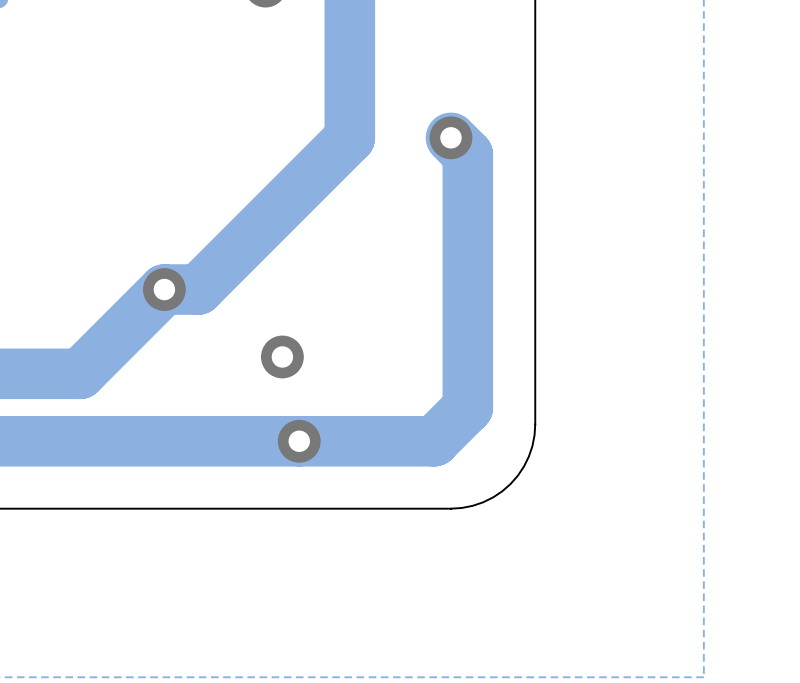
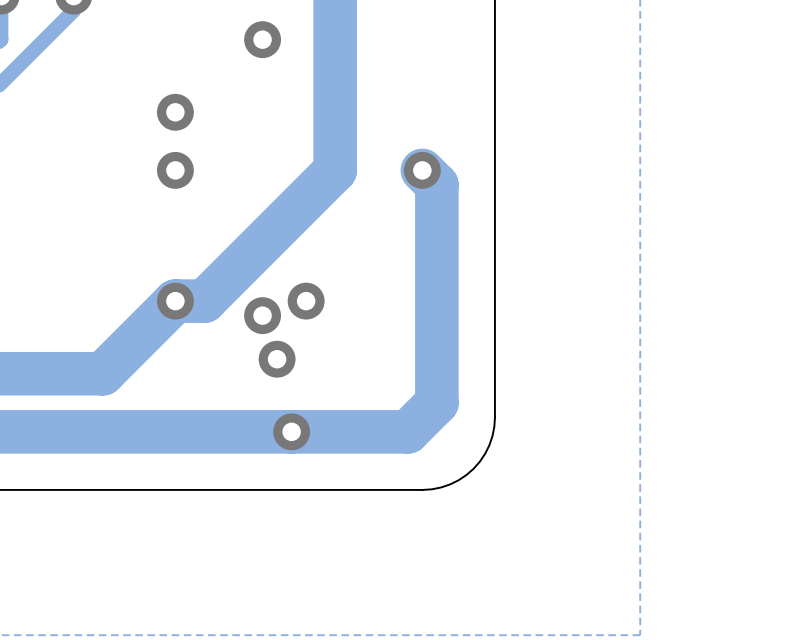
via: none -> (175, 112)
via: none -> (175, 170)
via: none -> (306, 301)
via: none -> (262, 315)

